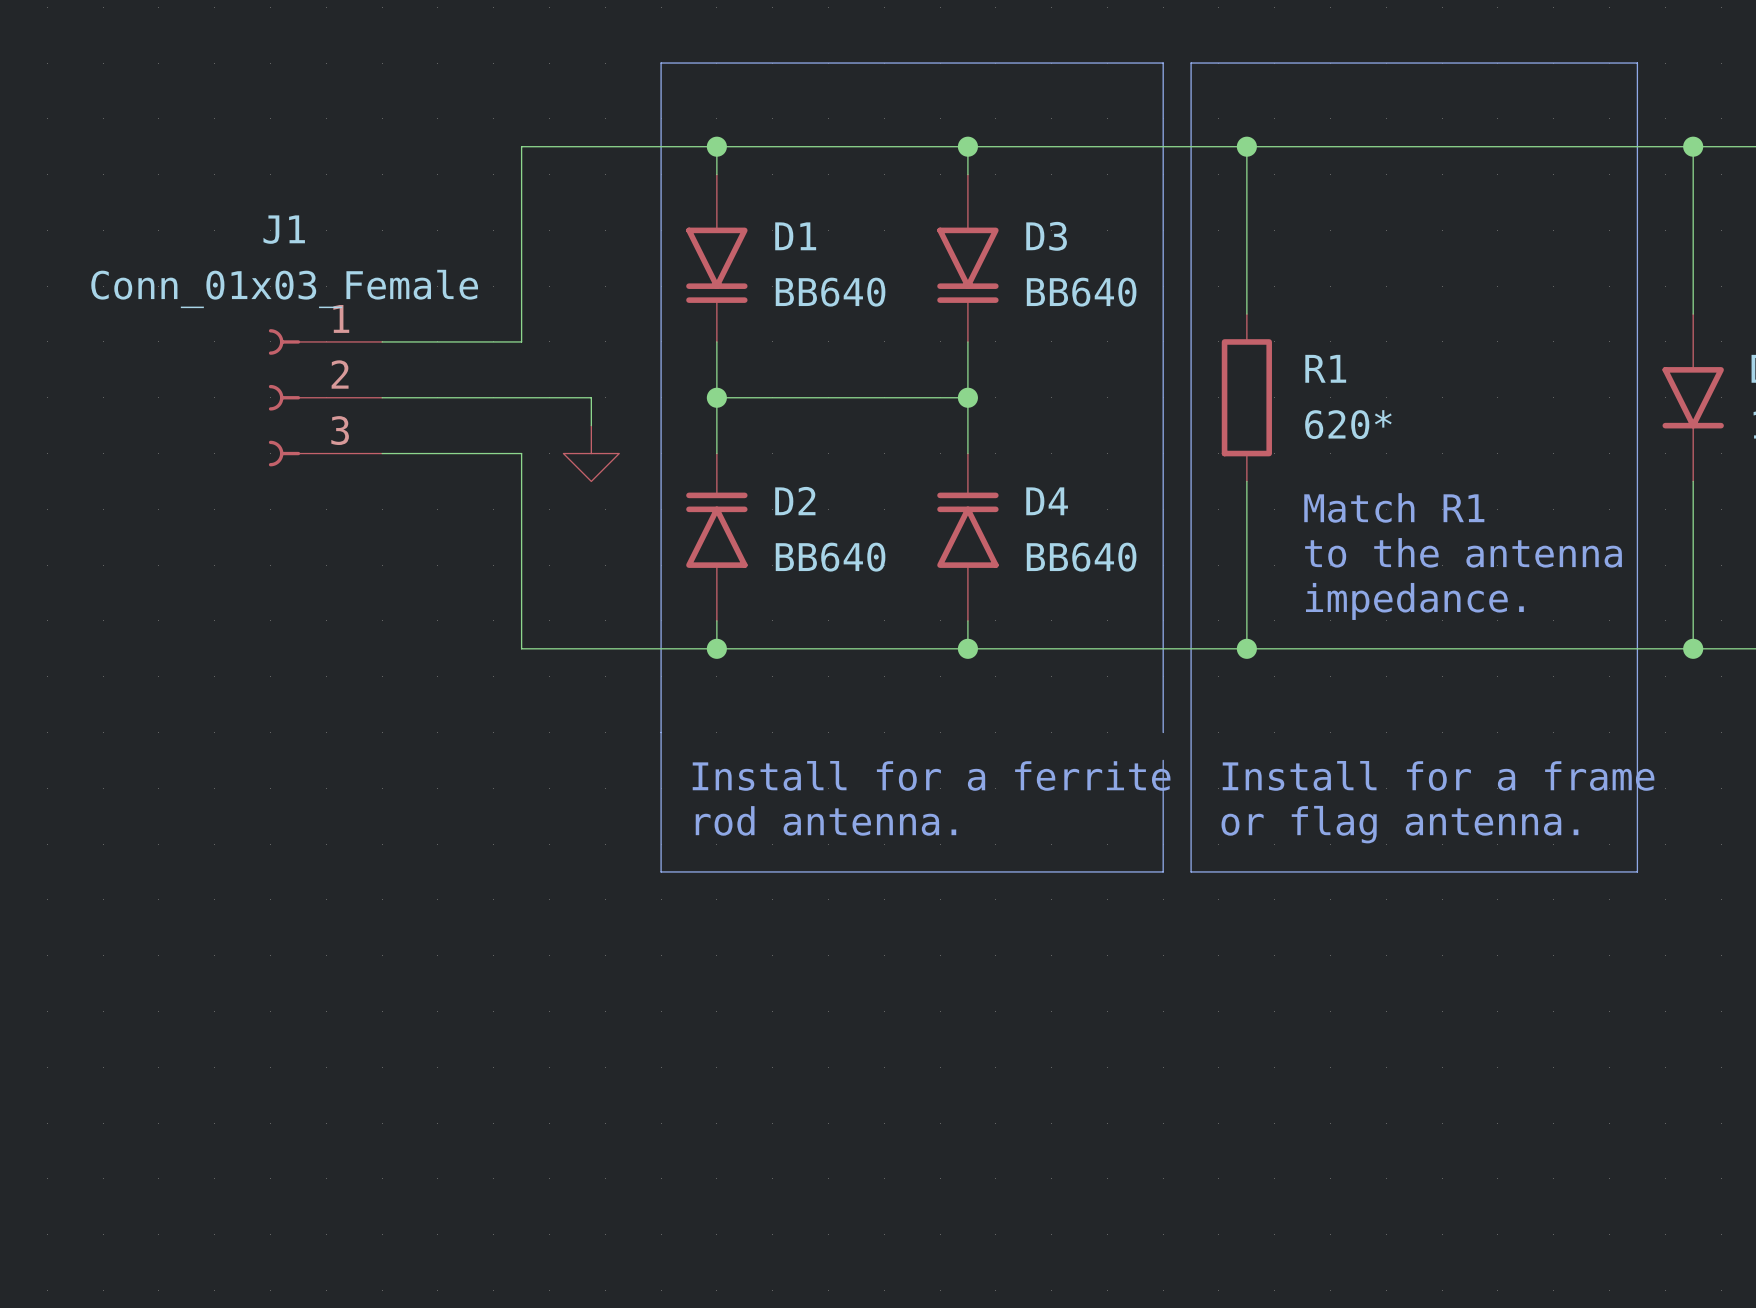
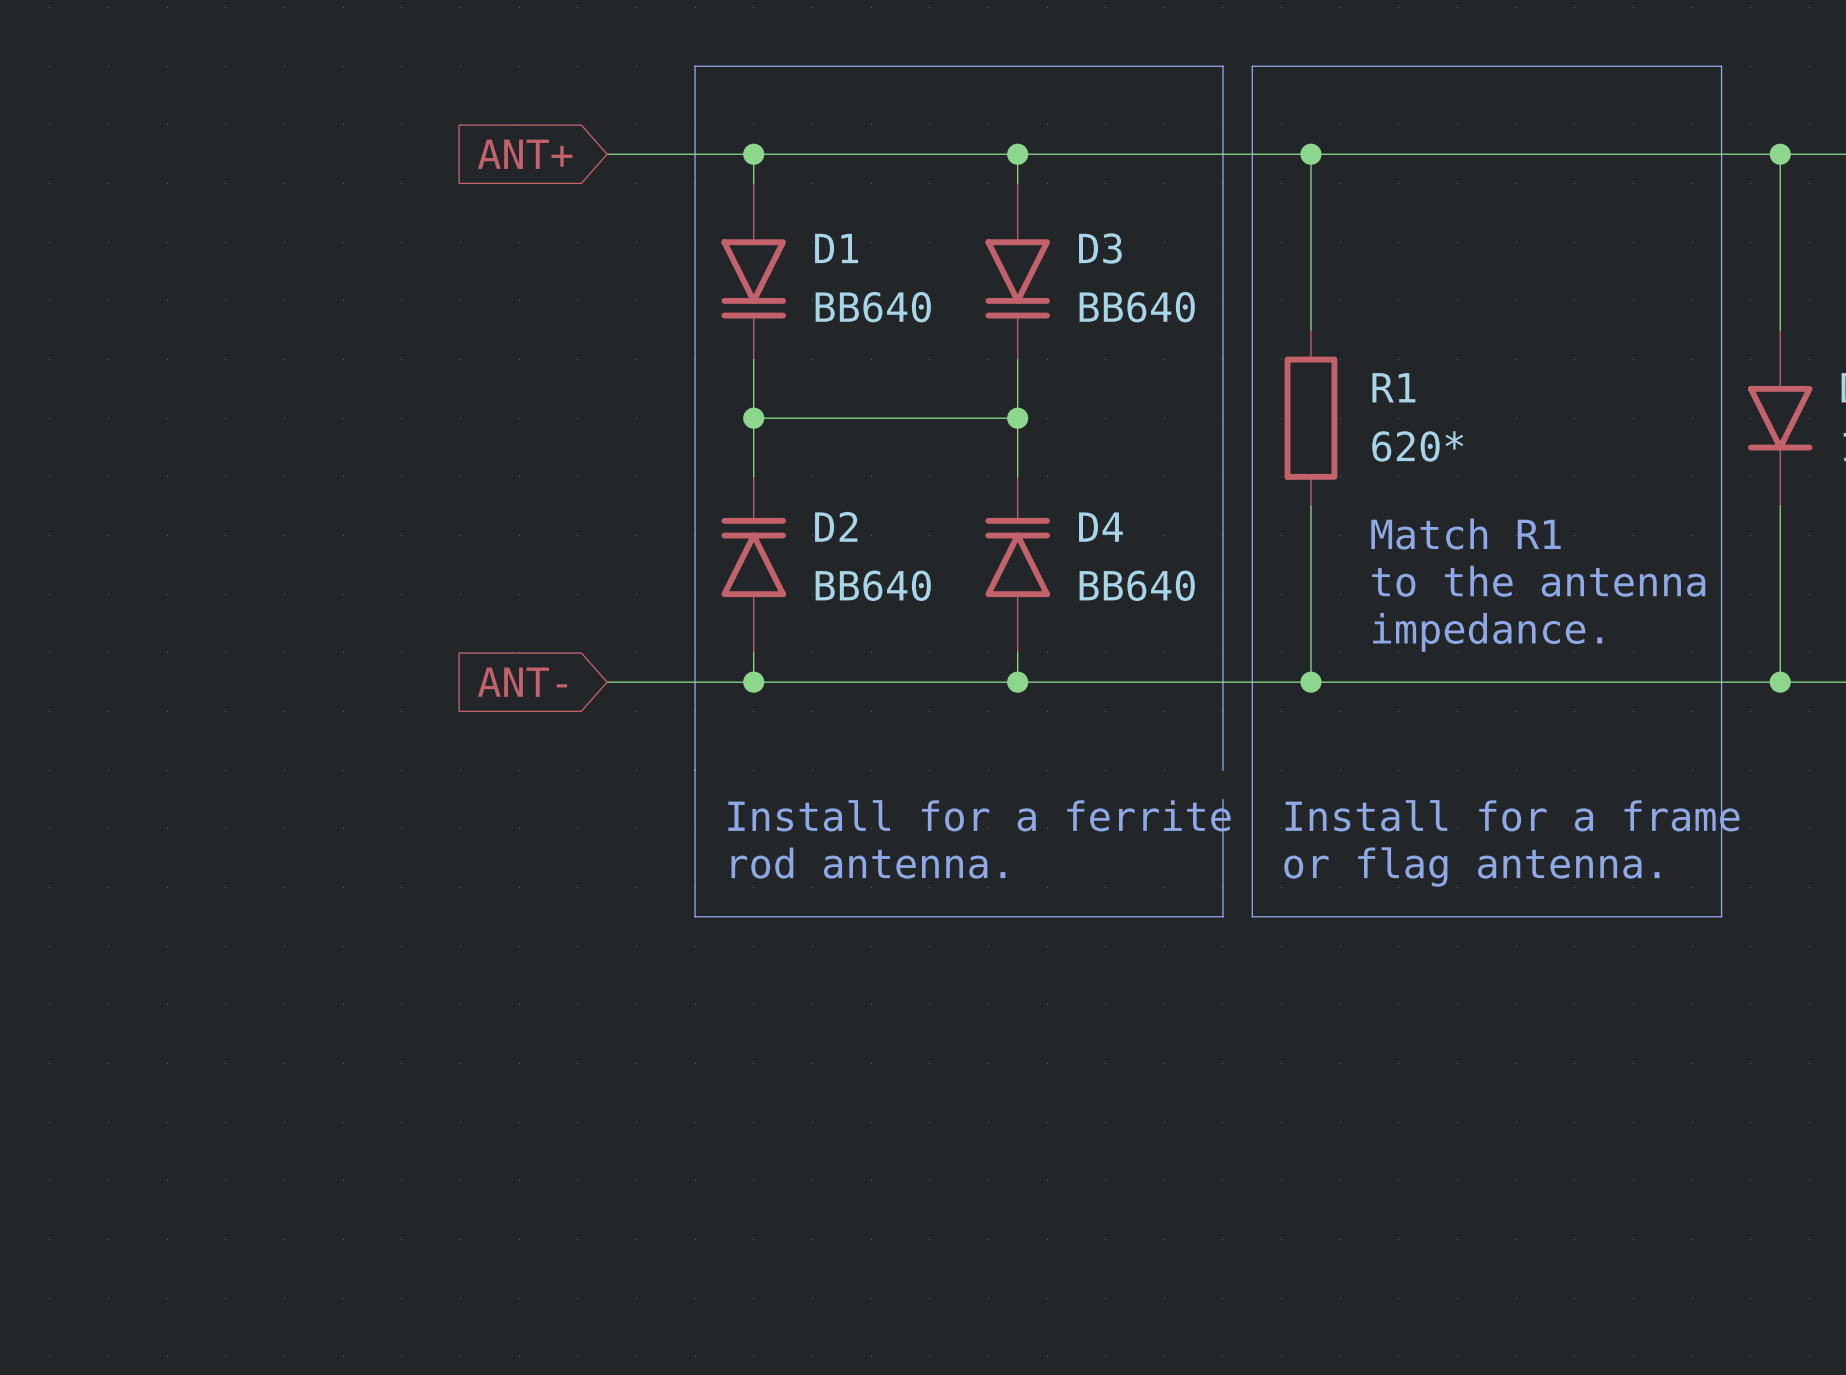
global label: none -> ANT+ (525, 154)
wire: (577, 146) (521, 146) (521, 341) (382, 341) -> none
J1: Conn_01x03_Female (325, 397) -> none
wire: (382, 397) (591, 397) (591, 425) -> none
wire: (382, 453) (521, 453) (521, 648) (577, 648) -> none
power symbol: (591, 453) -> none
global label: none -> ANT- (522, 682)

